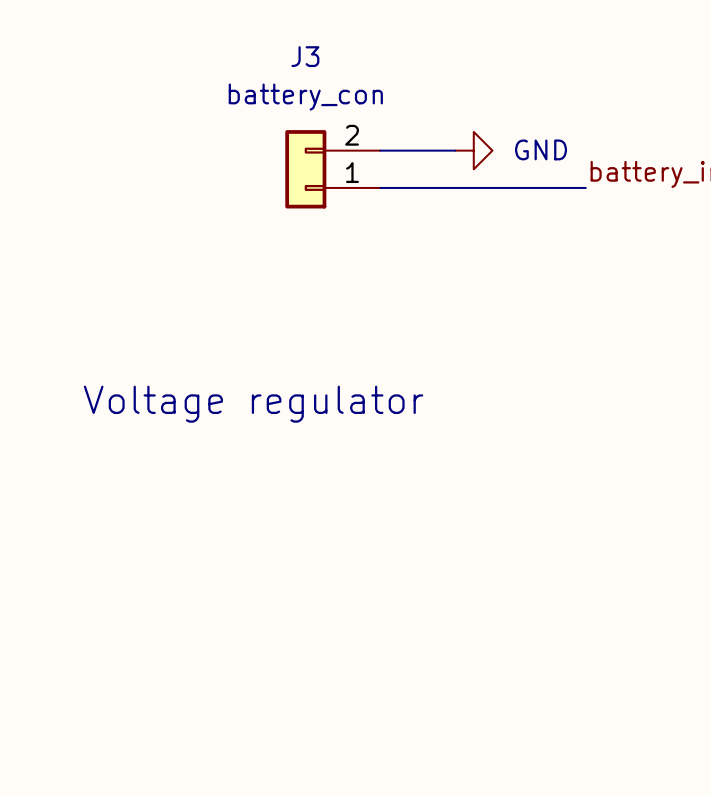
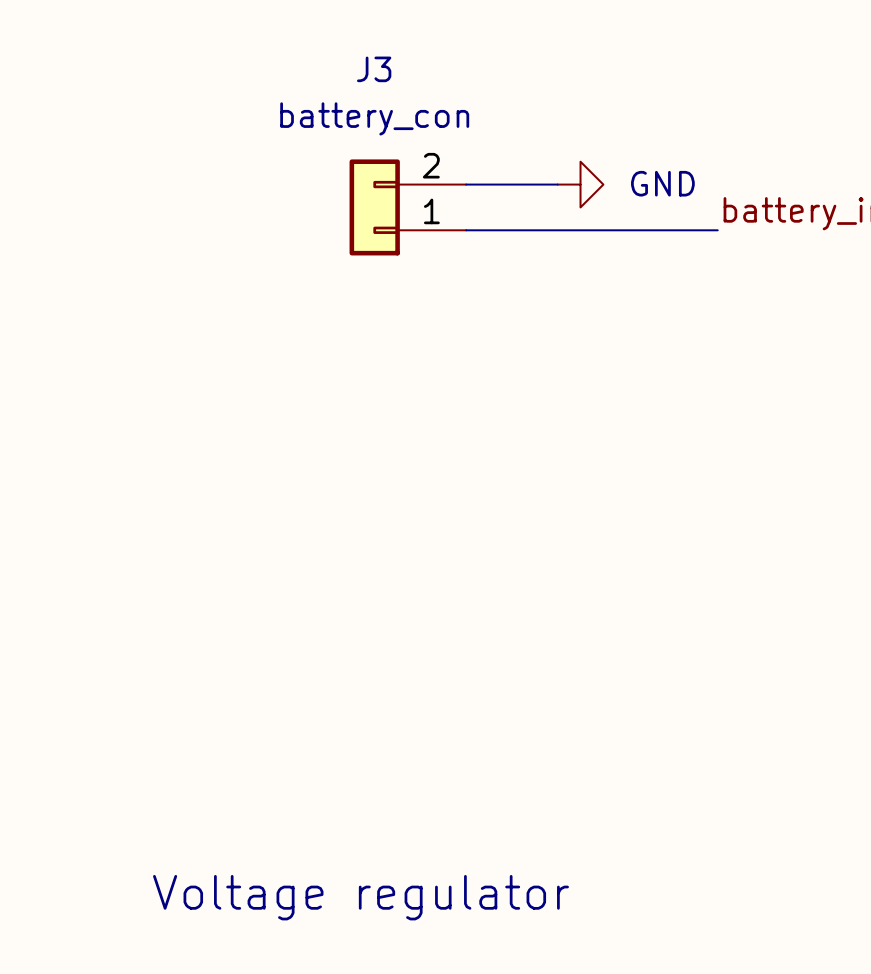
text position: Voltage regulator (253, 404) -> Voltage regulator (360, 897)

